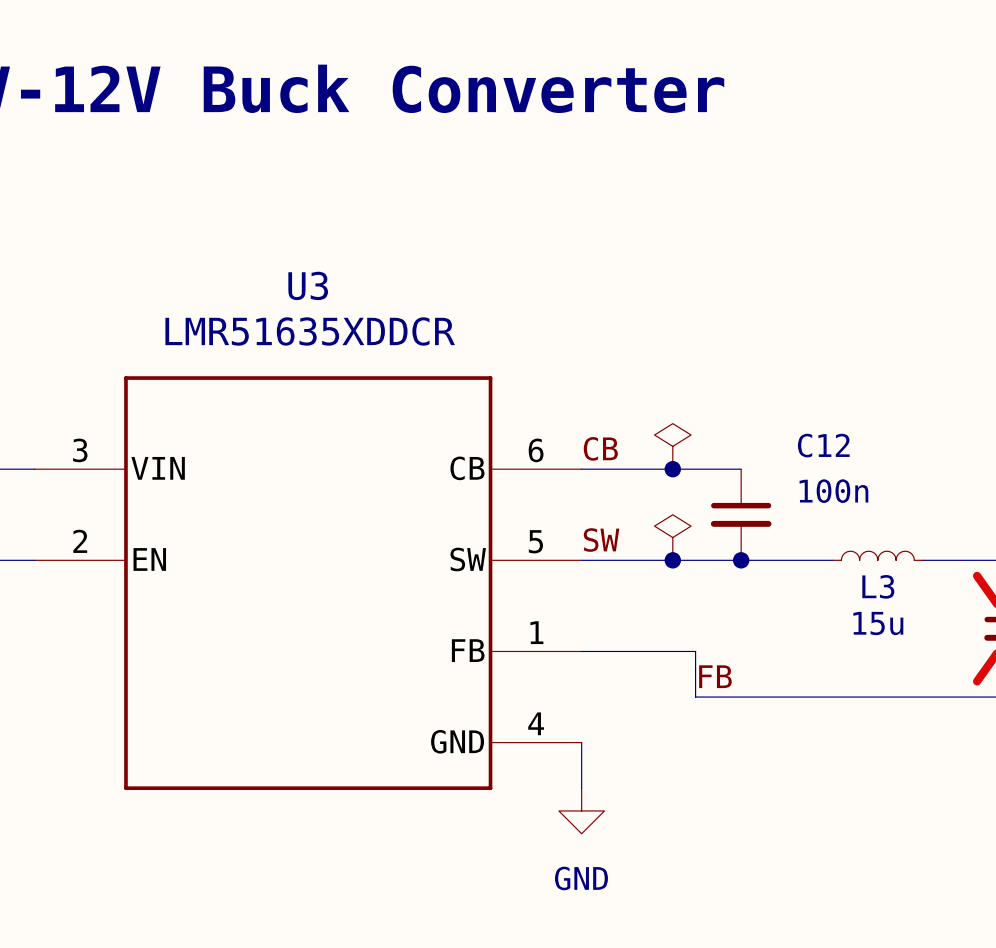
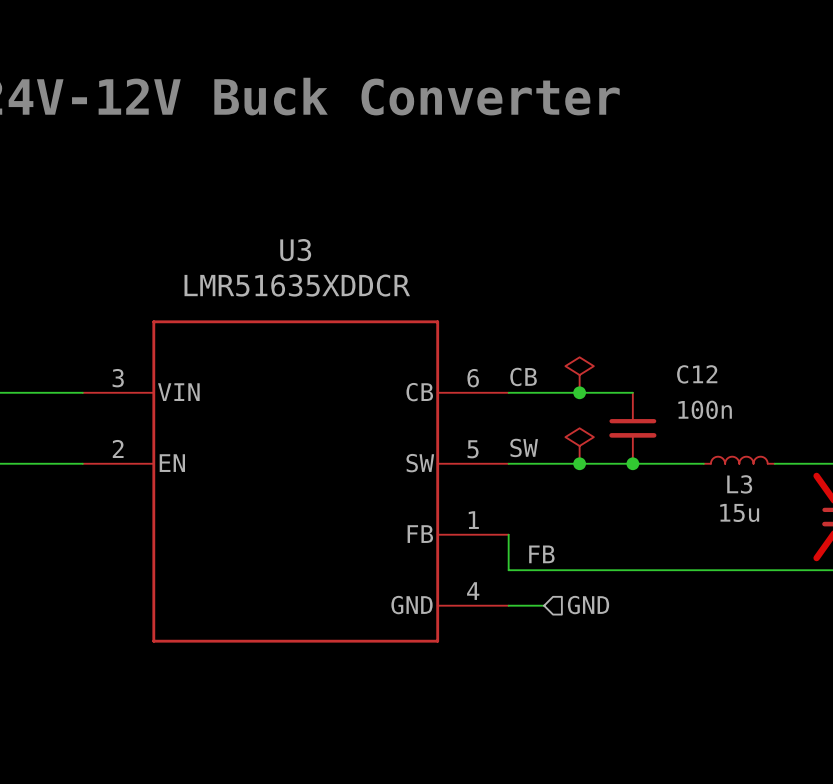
wire: (581, 651) (695, 651) (695, 697) -> (508, 534) (508, 570) (597, 570)
label position: FB (715, 676) -> FB (541, 554)
hierarchical label: none -> GND (588, 605)
wire: (581, 742) (581, 788) -> (508, 605) (544, 605)
power symbol: GND (581, 810) -> none

